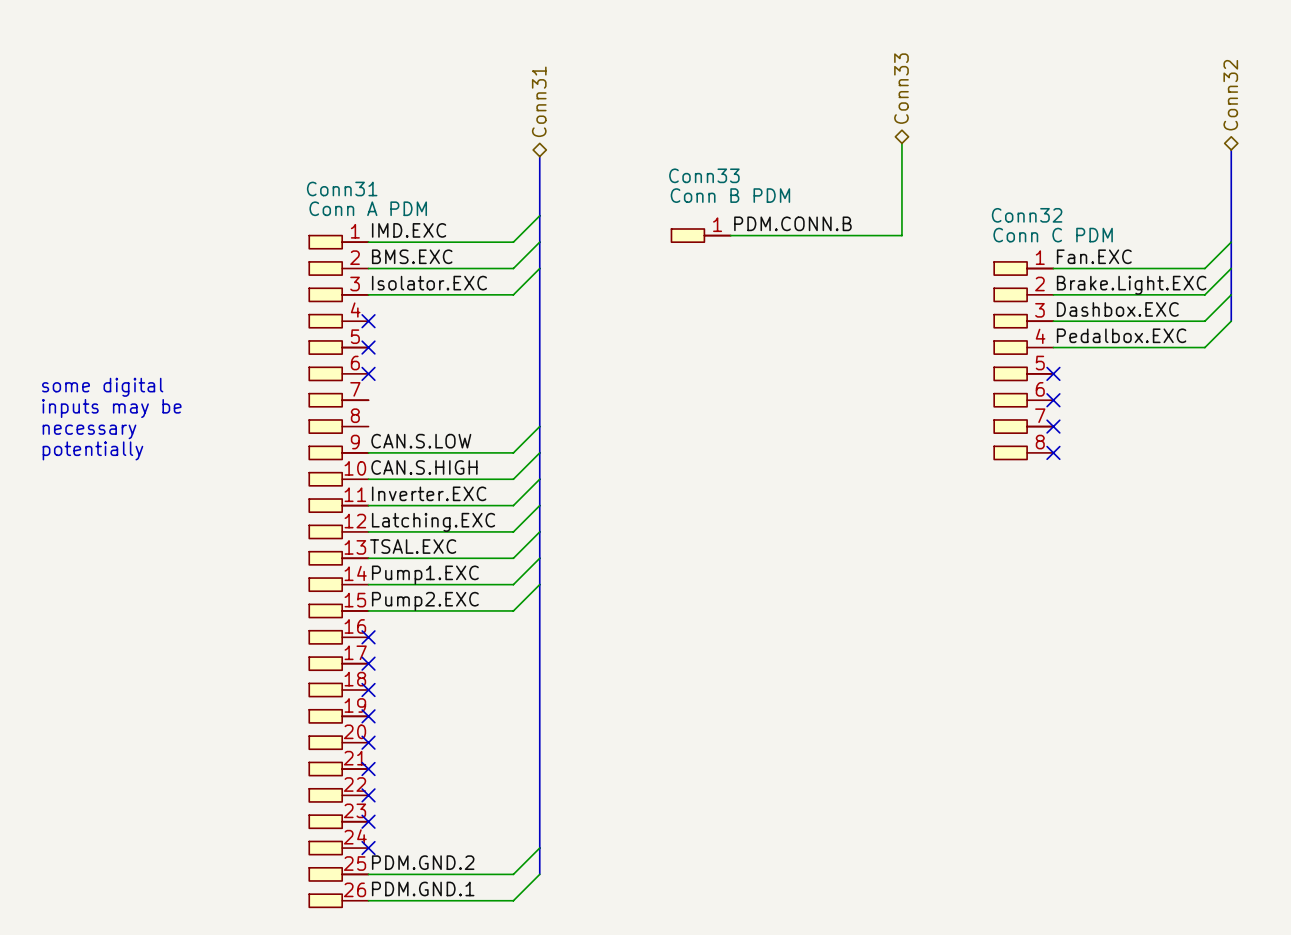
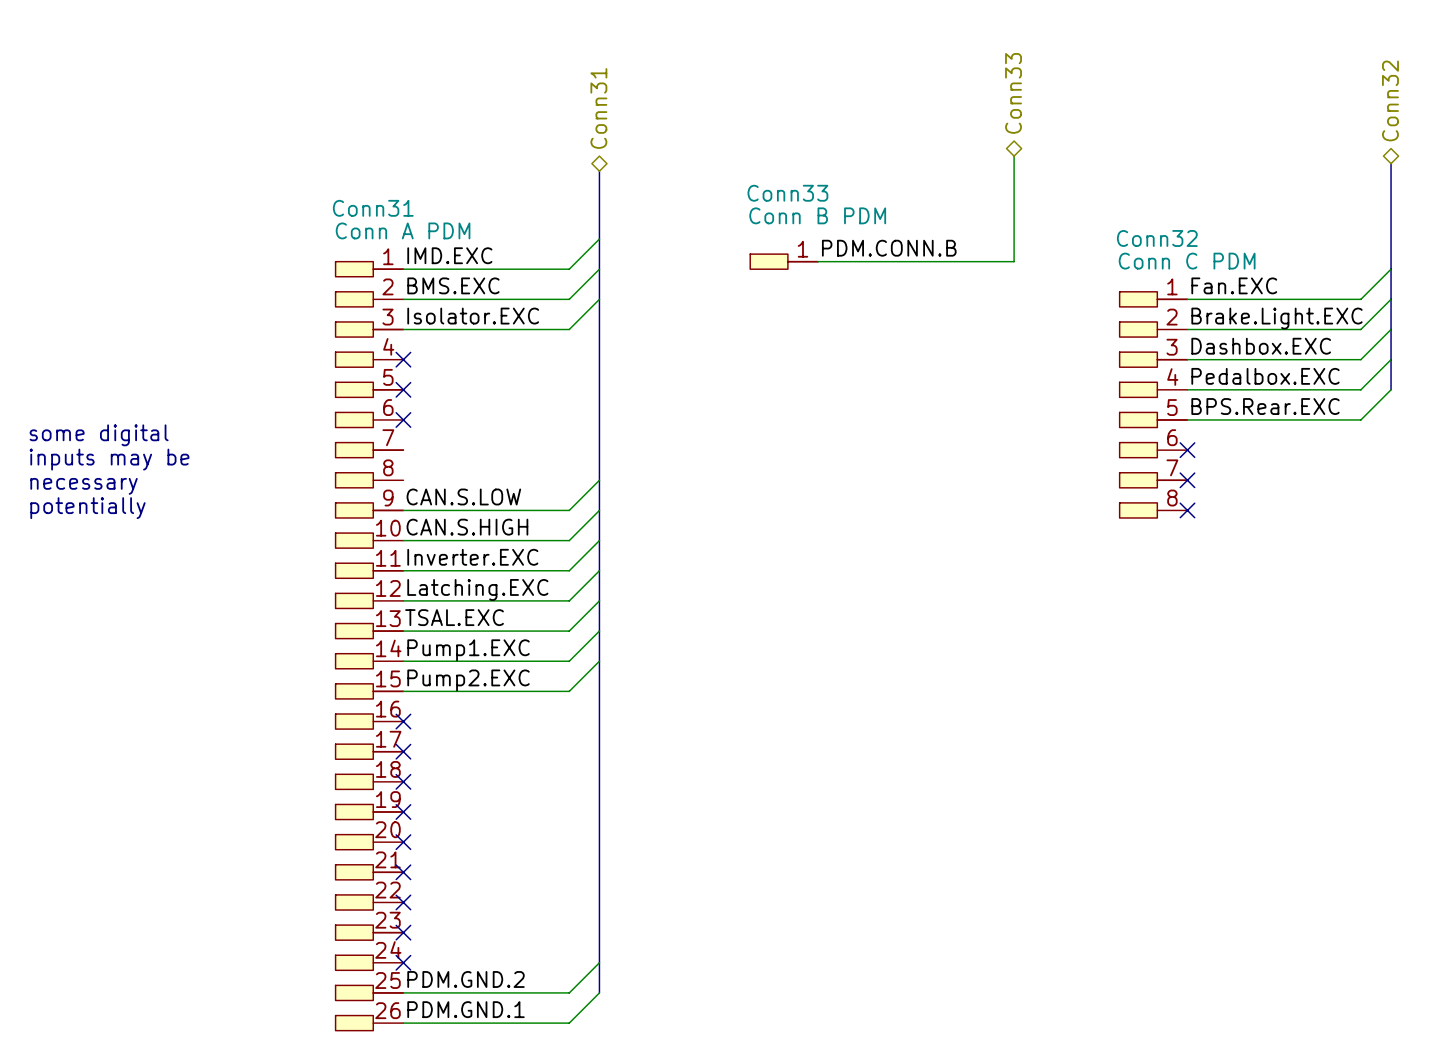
bus: none -> (1391, 359) (1391, 389)
wire: none -> (1391, 389) (1360, 419) (1187, 419)
label: none -> BPS.Rear.EXC (1265, 406)
no-connect mark: (1053, 373) -> none

